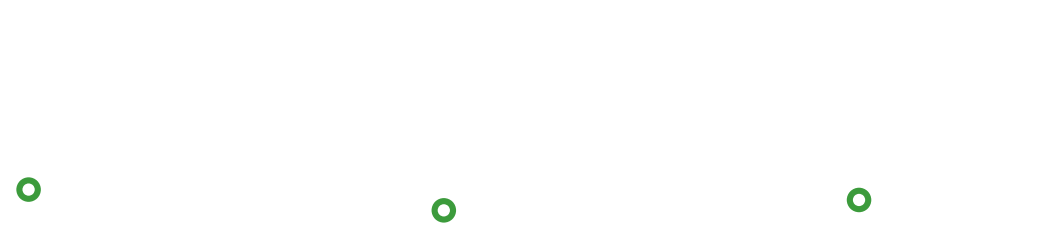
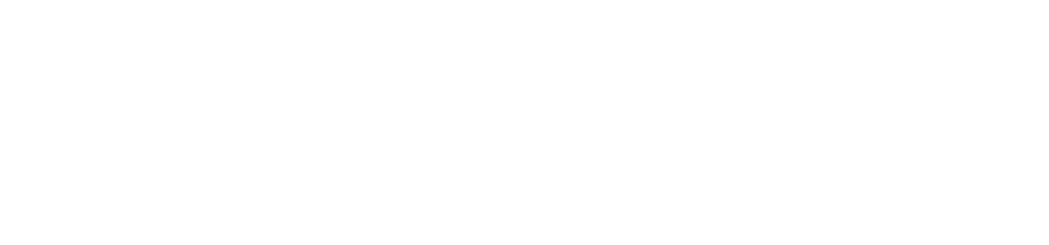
via: (28, 189) -> none
via: (859, 199) -> none
via: (443, 210) -> none

